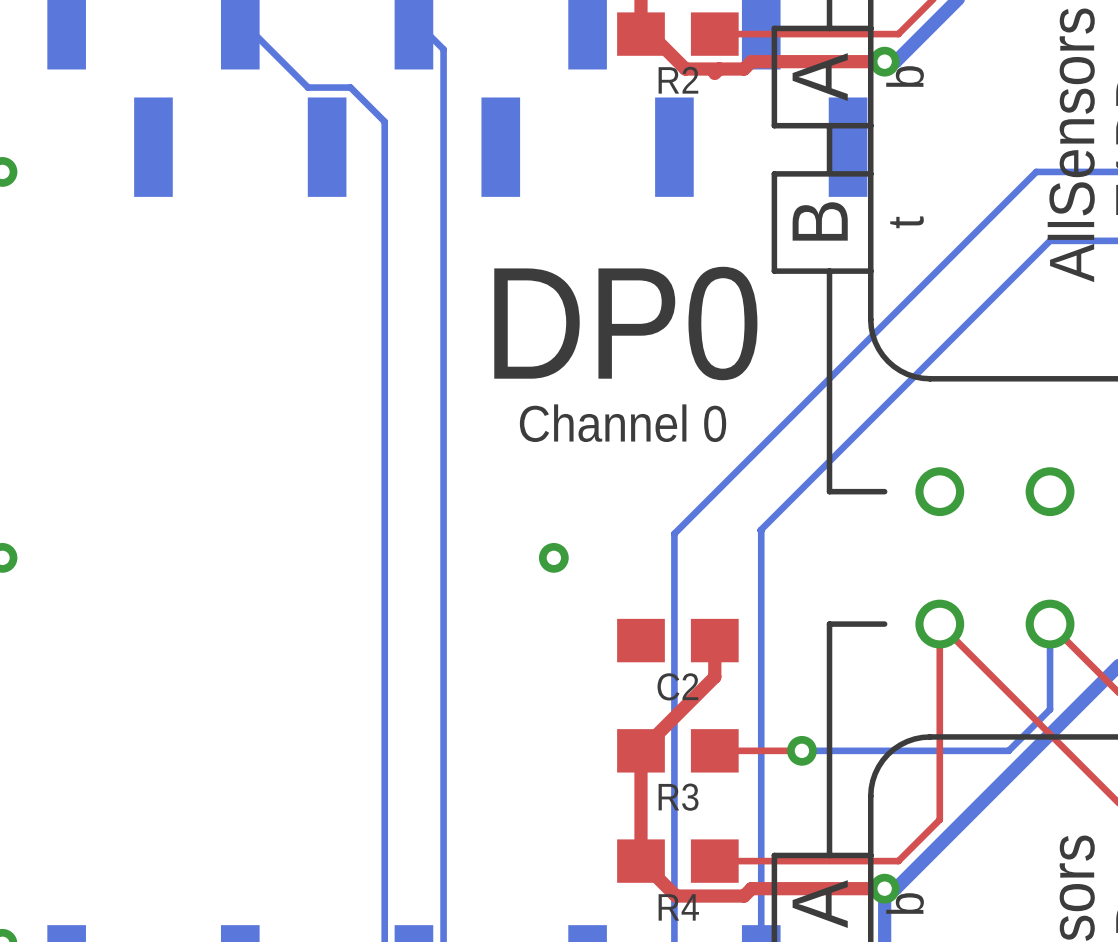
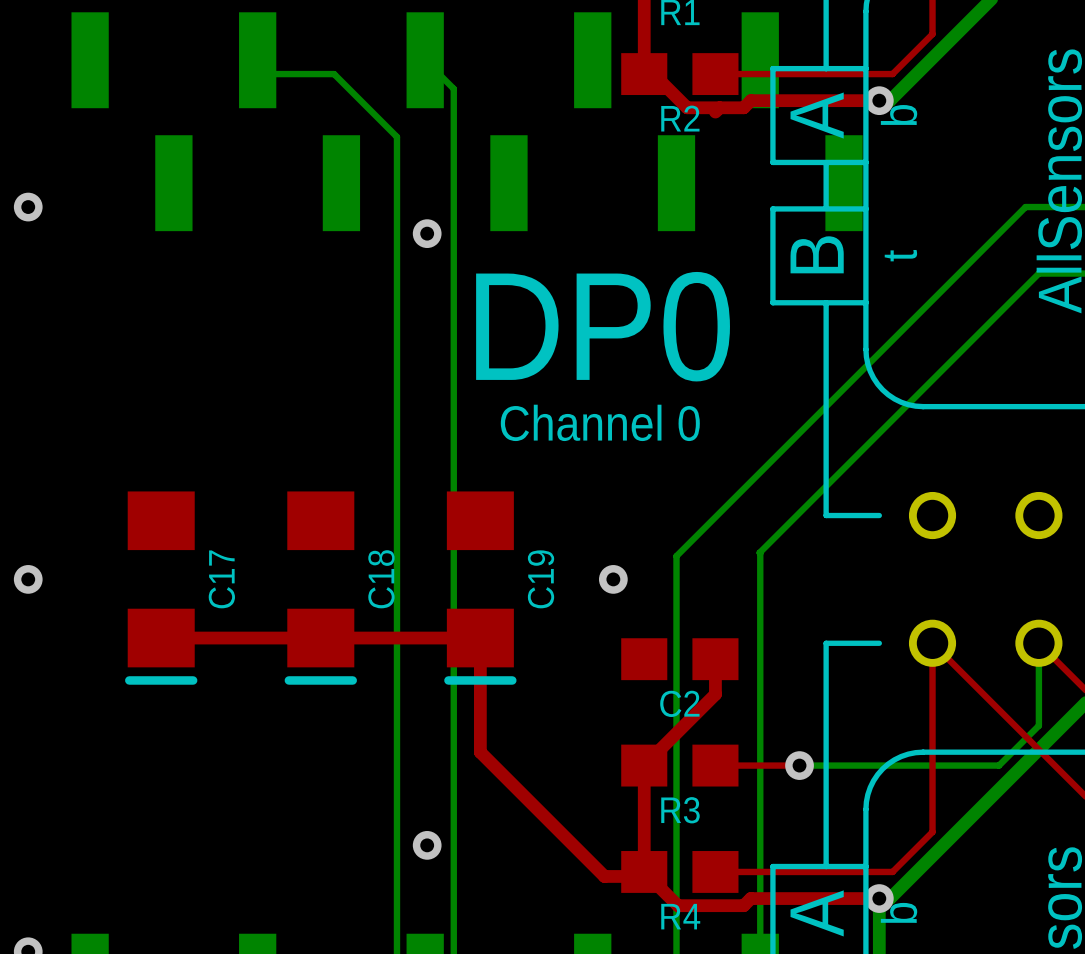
bottom track: (254, 34) (308, 87) (350, 87) (384, 121) -> (271, 74) (334, 74) (396, 136) (396, 158)
via: none -> (427, 233)
text position: DP0 (625, 323) -> DP0 (603, 326)
text position: Channel 0 (623, 423) -> Channel 0 (600, 422)
via position: (553, 557) -> (613, 579)
C17: none -> (161, 588)
C18: none -> (320, 588)
C19: none -> (480, 588)
top track: none -> (161, 638) (480, 638) (480, 752) (604, 876) (648, 876)
via: none -> (427, 845)

